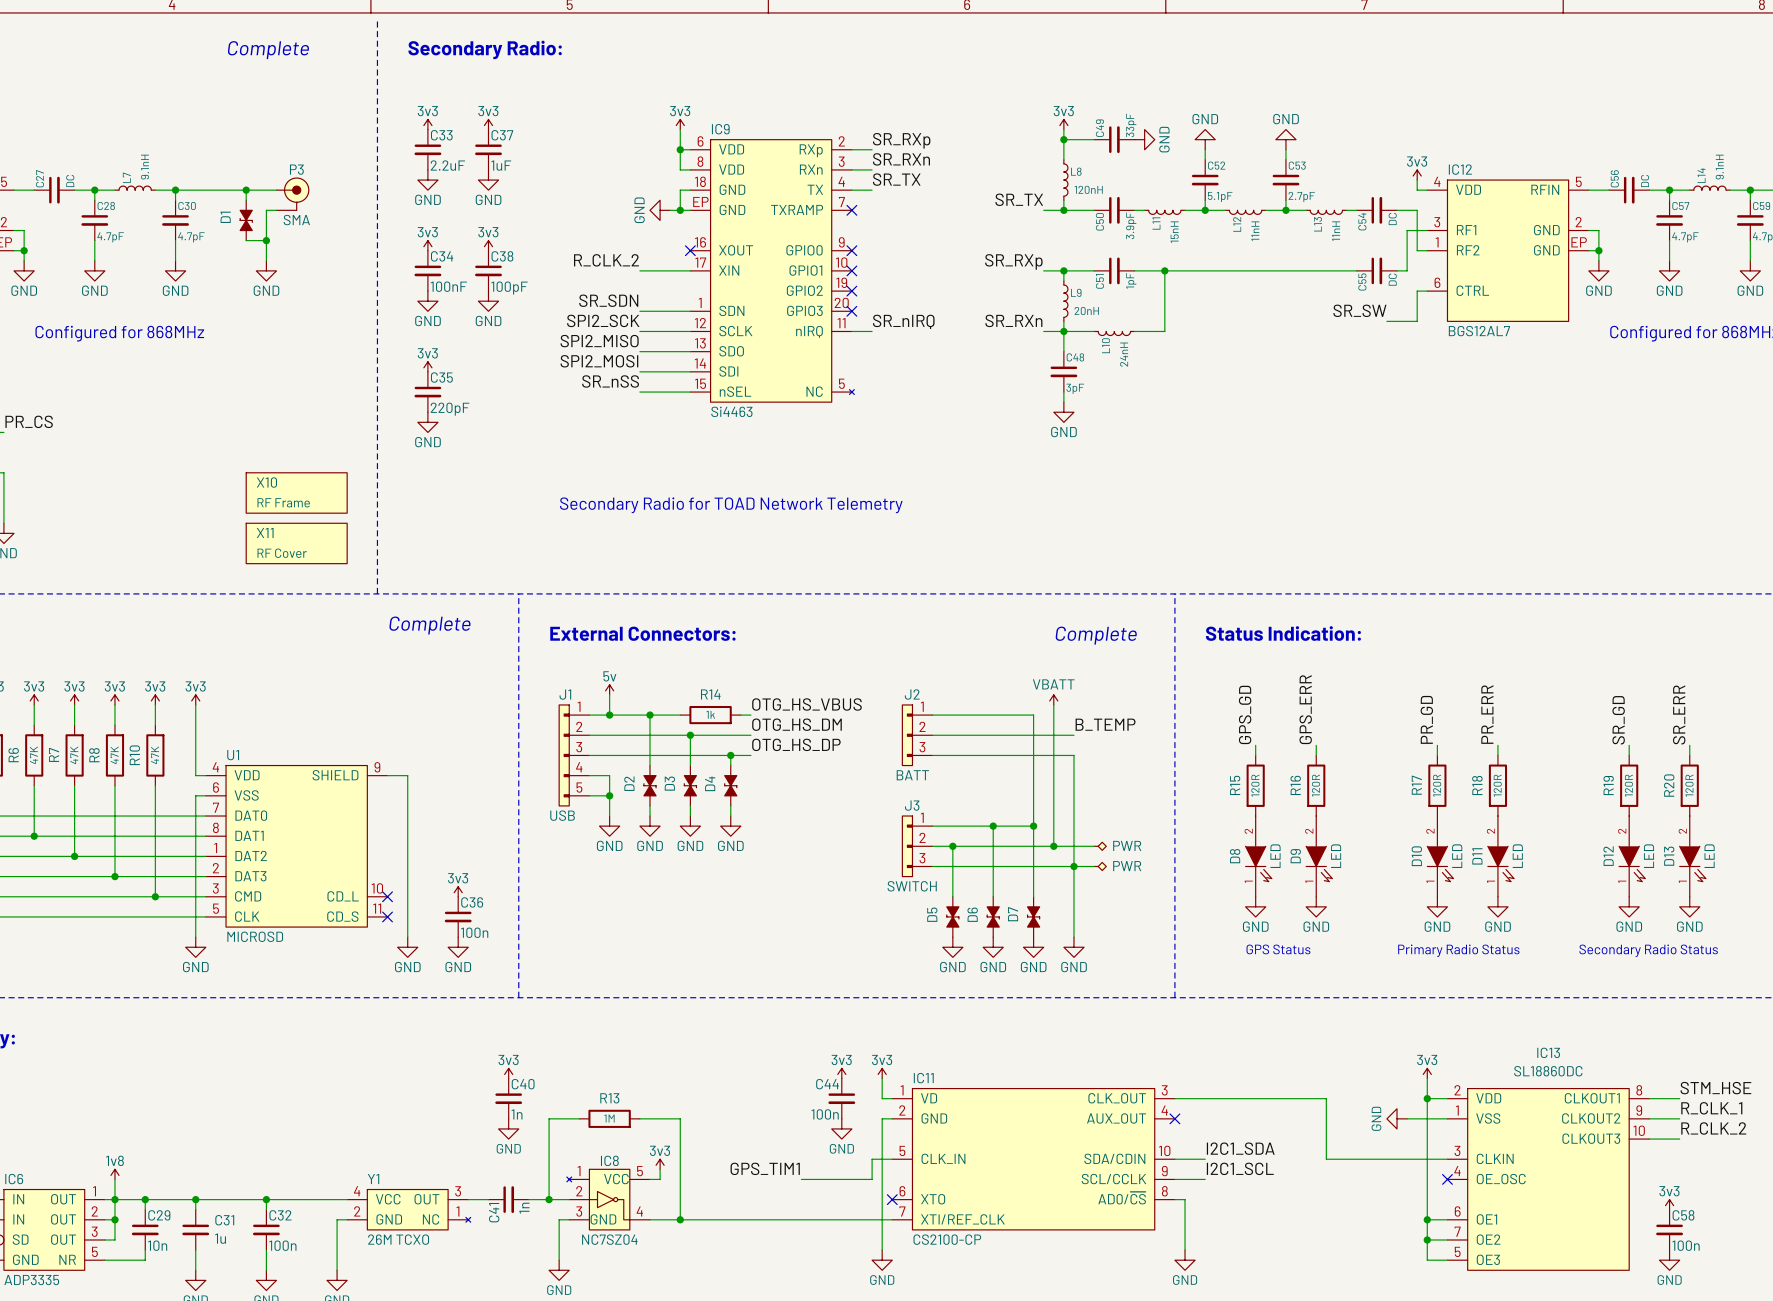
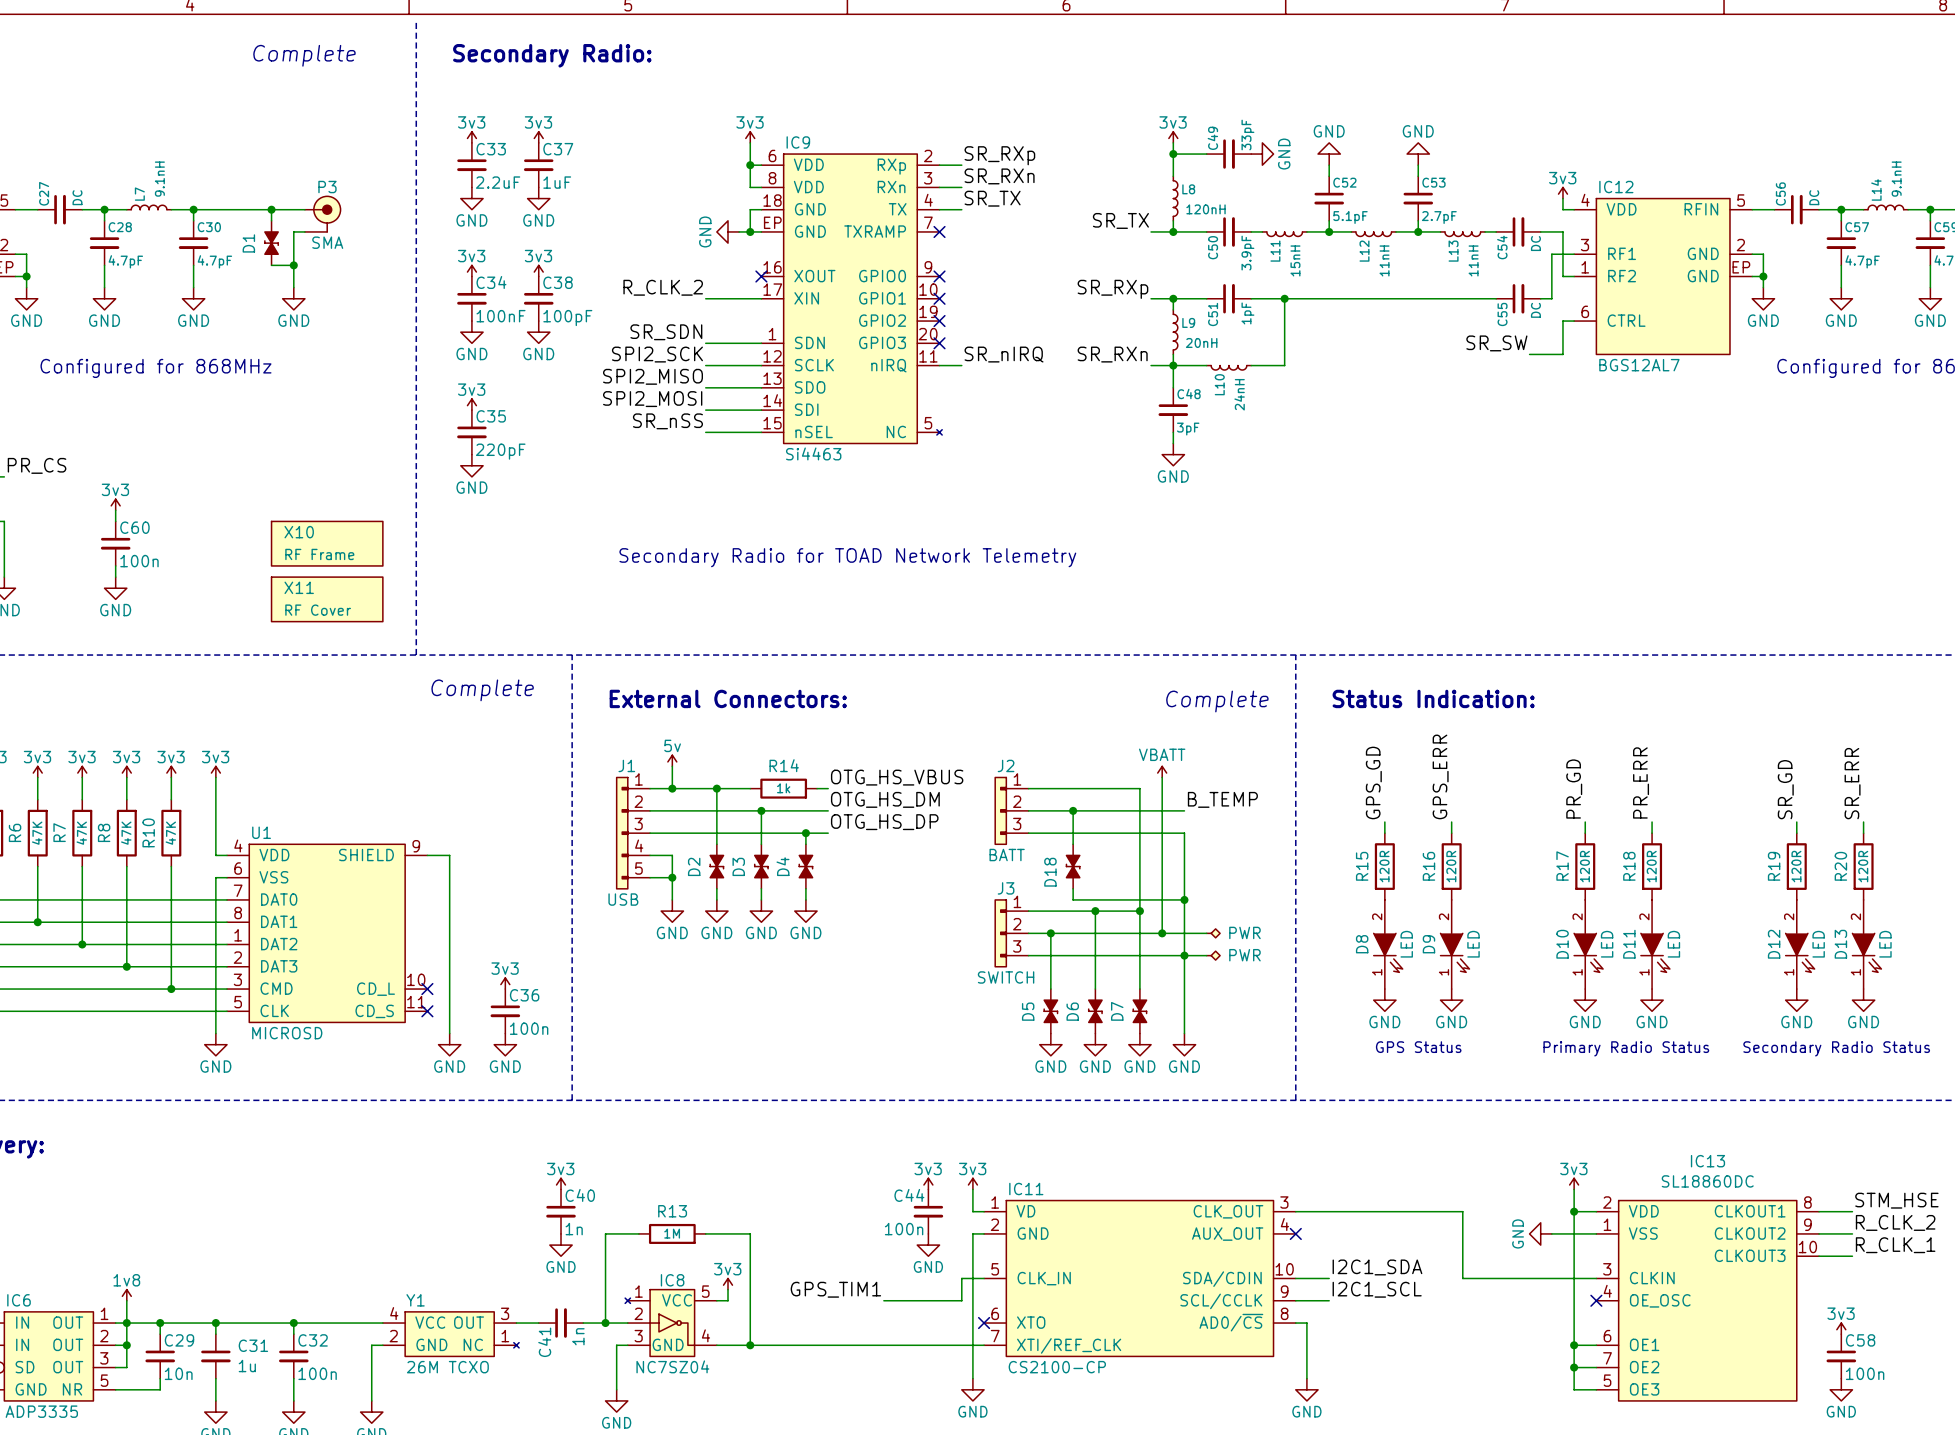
power symbol: none -> 3v3 (115, 504)
wire: none -> (115, 510) (115, 521)
C60: none -> 100n (115, 543)
wire: none -> (115, 565) (115, 577)
power symbol: none -> GND (115, 588)
wire: none -> (1073, 810) (1073, 844)
junction: none -> (1073, 810)
D18: none -> (1073, 866)
wire: none -> (1073, 888) (1073, 899) (1184, 899)
junction: none -> (1184, 899)
label: R_CLK_1 (1711, 1108) -> R_CLK_2 (1895, 1222)
label: R_CLK_2 (1713, 1128) -> R_CLK_1 (1895, 1245)

